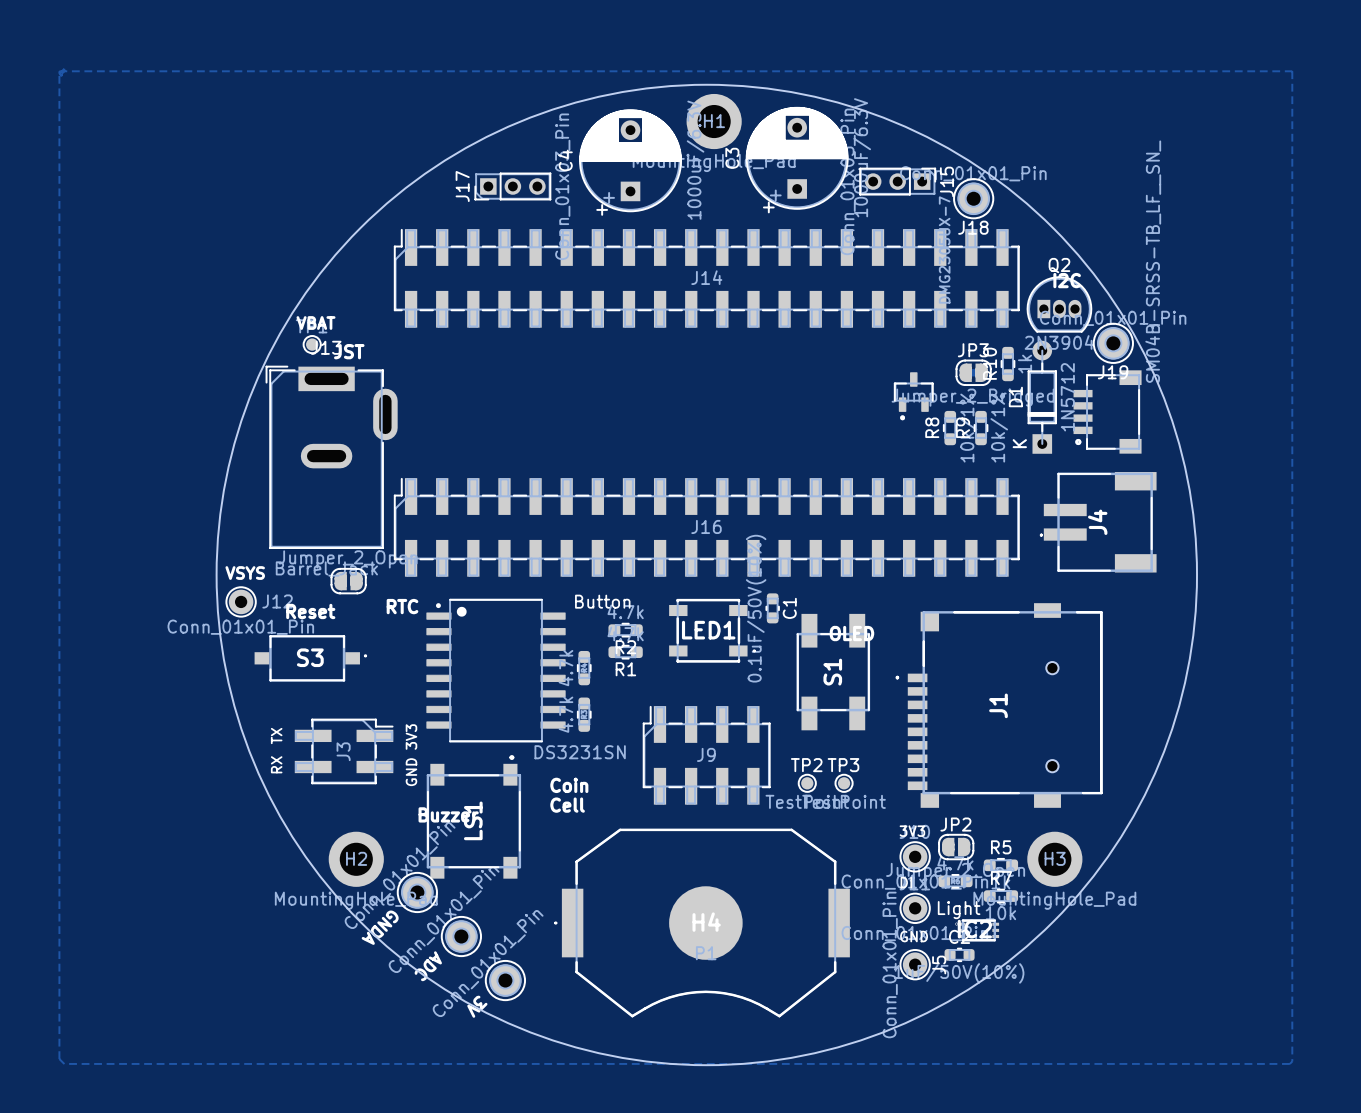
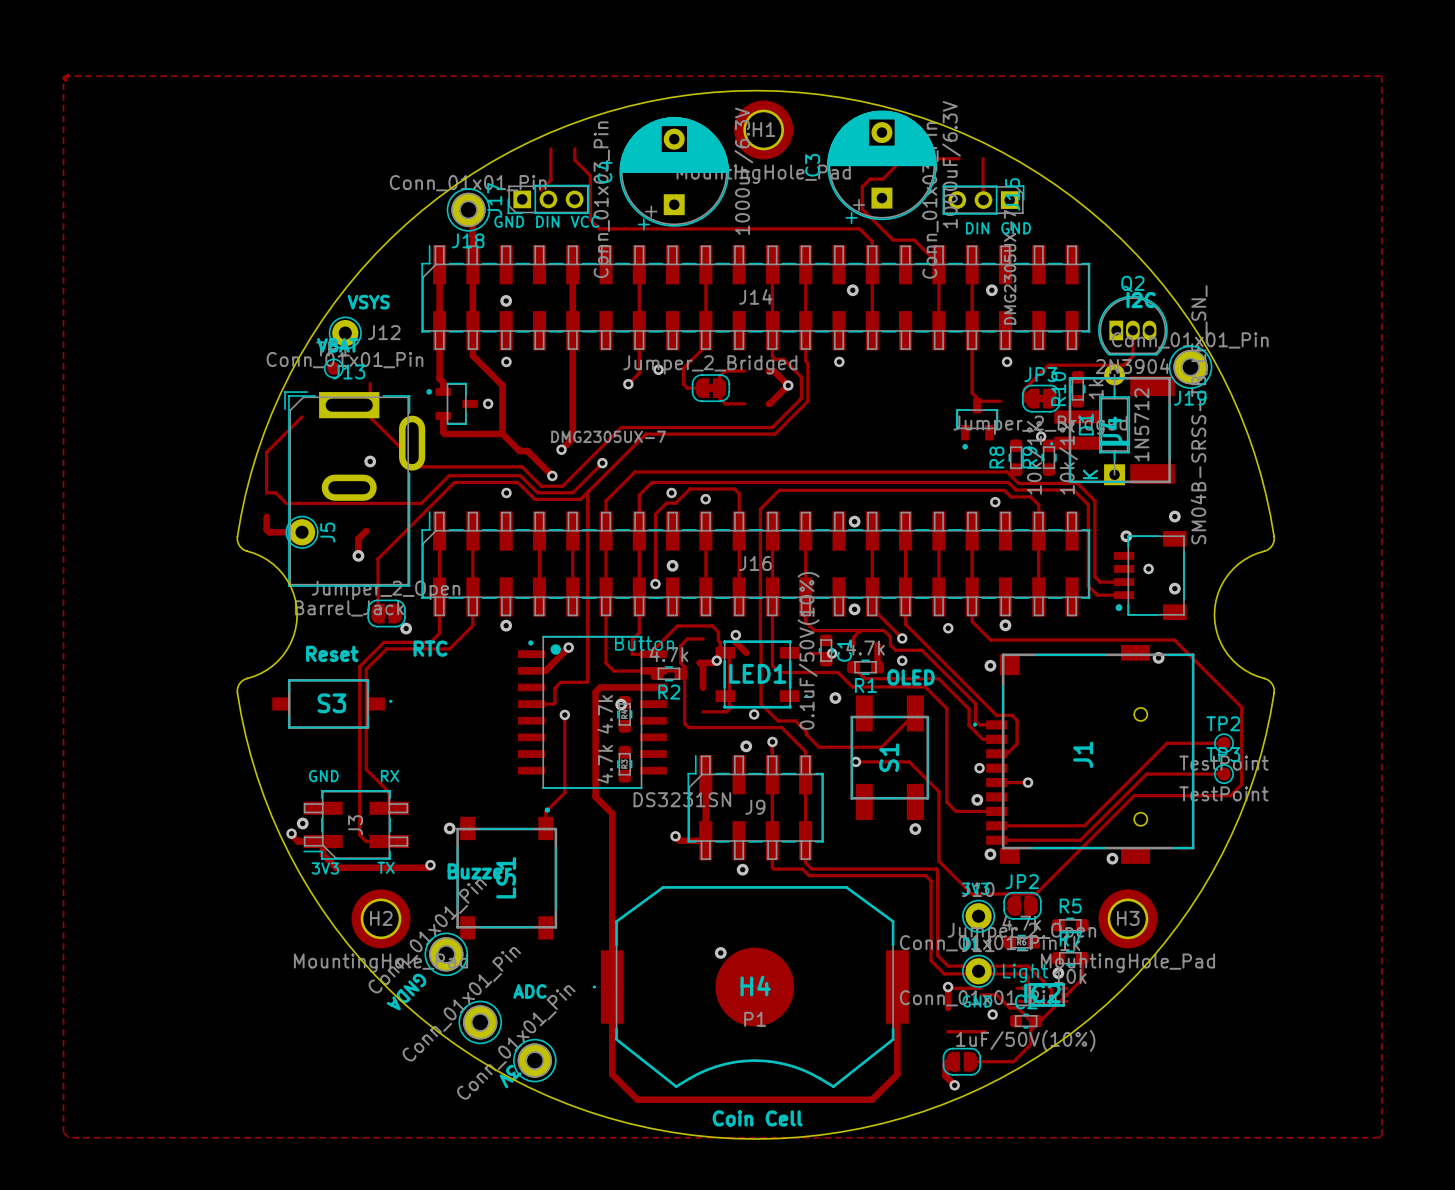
round board edge: [215, 84, 1198, 1066] -> none
track: none -> (550, 148) (550, 179) (540, 190)
track: none -> (574, 148) (574, 160) (590, 175) (590, 219) (599, 228) (859, 228) (872, 241) (872, 330)
track: none -> (959, 158) (903, 158) (882, 179) (870, 179) (862, 186) (862, 209) (893, 240) (914, 240) (938, 264) (938, 330)
track: none -> (983, 158) (983, 207)
C3 position: (797, 160) -> (881, 167)
J15 position: (897, 181) -> (983, 200)
track: none -> (472, 209) (472, 355) (502, 385) (502, 433)
J18 position: (973, 198) -> (468, 209)
text: none -> GND (509, 221)
text: none -> DIN (547, 221)
text: none -> VCC (585, 221)
text: none -> DIN (977, 228)
text: none -> GND (1016, 228)
track: none -> (439, 264) (439, 378) (443, 382) (443, 391)
track: none -> (572, 264) (572, 438) (561, 449)
track: none -> (639, 264) (639, 373) (628, 384)
track: none -> (705, 264) (705, 345) (683, 368) (683, 384) (687, 388) (702, 388)
track: none -> (772, 264) (772, 356) (775, 359) (783, 359) (801, 377) (801, 398) (772, 427) (621, 427) (562, 486) (541, 486) (521, 466) (419, 466) (370, 417) (370, 383)
track: none -> (805, 264) (805, 361) (807, 363) (807, 401) (775, 434) (645, 434) (580, 499) (534, 499) (517, 482) (454, 482) (378, 558) (378, 613)
track: none -> (972, 264) (972, 393) (980, 401) (1000, 401)
via: none -> (852, 290)
via: none -> (991, 290)
via: none -> (506, 300)
text: none -> VSYS (368, 302)
track: none -> (1132, 322) (1132, 356) (1123, 365) (1048, 365) (1024, 389) (1024, 401)
via: none -> (506, 361)
via: none -> (839, 361)
via: none -> (1007, 361)
via: none -> (658, 369)
track: none -> (744, 371) (725, 371) (719, 376) (719, 397) (725, 403) (744, 403)
track: none -> (768, 371) (773, 371) (788, 385) (768, 403)
text: JST (349, 351) -> none
via: none -> (628, 384)
via: none -> (788, 385)
part: none -> Jumper_2_Bridged (710, 388)
part: none -> DMG2305UX-7 (452, 403)
via: none -> (488, 403)
track: none -> (443, 415) (444, 433) (502, 433)
track: none -> (302, 416) (266, 452) (266, 492) (275, 492) (286, 503) (421, 503) (448, 475) (520, 475) (537, 492) (572, 492) (602, 463)
track: none -> (502, 433) (519, 451) (527, 451) (552, 475)
via: none -> (1041, 436)
part position: (1107, 411) -> (1150, 575)
via: none -> (561, 449)
via: none -> (370, 461)
via: none -> (602, 463)
via: none -> (552, 475)
track: none -> (587, 492) (587, 681) (560, 682) (554, 688) (553, 704) (531, 704)
via: none -> (506, 492)
via: none -> (671, 492)
via: none -> (705, 499)
via: none -> (995, 502)
track: none -> (266, 516) (266, 529) (269, 532) (302, 532)
via: none -> (1174, 516)
via: none -> (854, 521)
track: none -> (366, 530) (358, 538) (358, 555)
track: none -> (439, 530) (439, 633) (430, 642) (383, 642) (359, 666) (359, 835) (366, 841) (389, 841)
track: none -> (472, 530) (472, 625) (449, 648) (386, 648) (366, 669) (366, 769) (389, 792) (389, 808)
track: none -> (539, 530) (539, 597)
track: none -> (572, 530) (572, 597)
track: none -> (705, 530) (705, 597)
track: none -> (772, 530) (772, 665) (779, 672) (838, 672) (852, 686) (925, 686) (946, 708) (946, 802) (955, 811) (996, 811)
track: none -> (805, 530) (805, 621) (814, 630) (883, 630) (890, 637) (890, 644) (895, 650) (921, 650) (975, 703) (975, 720) (979, 724) (996, 724)
track: none -> (872, 530) (872, 608) (902, 638)
track: none -> (905, 530) (905, 624) (996, 715) (1012, 715) (1017, 720) (1017, 743) (1007, 753) (996, 753)
track: none -> (938, 530) (938, 597)
track: none -> (972, 530) (972, 621) (990, 640) (1174, 640) (1241, 707) (1241, 784) (1230, 795) (1134, 795) (1035, 893) (971, 893) (938, 861) (938, 791) (909, 761) (855, 761)
board edge: none -> (237, 536) (238, 542) (242, 549) (260, 556) (278, 568) (287, 580) (295, 600) (297, 614) (295, 629) (287, 649) (278, 660) (267, 669) (241, 681) (238, 686) (237, 693) (250, 755) (271, 815) (299, 873) (334, 926) (361, 959) (405, 1005) (455, 1044) (491, 1067) (529, 1087) (588, 1111) (629, 1123) (671, 1132) (713, 1137) (777, 1138) (819, 1135) (882, 1123) (923, 1111) (982, 1087) (1019, 1067) (1072, 1032) (1105, 1005) (1136, 975) (1177, 926) (1201, 891) (1231, 835) (1247, 796) (1260, 755) (1274, 693) (1273, 686) (1268, 680) (1250, 673) (1233, 660) (1220, 642) (1216, 629) (1214, 607) (1218, 593) (1224, 580) (1233, 568) (1244, 559) (1269, 548) (1273, 542) (1274, 536) (1260, 474) (1239, 413) (1211, 356) (1177, 303) (1136, 254) (1105, 224) (1055, 184) (1019, 161) (962, 133) (923, 118) (882, 106) (840, 97) (777, 91) (734, 91) (692, 94) (629, 106) (588, 118) (548, 133) (510, 151) (455, 184) (405, 224) (375, 254) (347, 286) (310, 338) (280, 394) (263, 433) (245, 494) (237, 536)
via: none -> (1126, 536)
via: none -> (358, 555)
J4 position: (1098, 522) -> (1112, 430)
via: none -> (672, 565)
via: none -> (1148, 568)
track: none -> (1124, 582) (1100, 582) (1094, 576) (1094, 500) (1077, 483) (1018, 483) (1007, 471) (634, 471) (606, 500) (606, 663) (613, 671) (681, 671) (684, 667) (680, 663) (680, 645) (687, 638) (703, 638)
track: none -> (655, 584) (655, 514) (666, 503) (675, 503) (689, 489) (734, 489) (739, 493) (739, 597)
via: none -> (655, 584)
via: none -> (1174, 588)
track: none -> (1124, 595) (1097, 595) (1088, 586) (1088, 504) (1073, 490) (1015, 490) (1008, 482) (651, 482) (639, 495) (639, 632) (632, 639) (632, 654) (655, 654)
track: none -> (1038, 597) (1038, 504) (1030, 496) (1011, 496) (1004, 490) (779, 490) (760, 509) (761, 703) (778, 720) (795, 720) (806, 732)
via: none -> (854, 609)
text: VSYS (245, 573) -> none
part position: (348, 581) -> (386, 613)
via: none -> (1005, 625)
via: none -> (506, 625)
via: none -> (406, 628)
via: none -> (948, 628)
track: none -> (860, 630) (853, 637) (853, 644)
track: none -> (735, 635) (735, 642) (746, 652)
via: none -> (735, 635)
via: none -> (902, 638)
J12 position: (241, 601) -> (345, 333)
track: none -> (877, 644) (877, 667)
track: none -> (568, 647) (545, 670) (531, 670)
via: none -> (568, 647)
track: none -> (810, 652) (832, 653)
track: none -> (653, 654) (653, 650) (677, 625) (712, 625) (718, 632) (720, 646) (729, 655) (729, 704) (731, 706) (726, 711) (703, 711)
via: none -> (832, 653)
via: none -> (1158, 657)
track: none -> (716, 660) (714, 662) (699, 662) (703, 666) (703, 687)
via: none -> (716, 660)
via: none -> (902, 660)
via: none -> (990, 665)
track: none -> (684, 667) (684, 723) (688, 727) (781, 727) (805, 752) (805, 862) (811, 869) (936, 869) (937, 955) (948, 966) (1028, 966) (1051, 989) (1051, 1000) (1048, 1003) (1017, 1001)
track: none -> (853, 667) (865, 678) (938, 678) (969, 709) (969, 725) (982, 739) (996, 739)
track: none -> (653, 687) (600, 687) (595, 692) (595, 796) (612, 813) (612, 1074) (637, 1099) (872, 1099) (897, 1074) (897, 987)
R1 position: (625, 652) -> (865, 667)
via: none -> (835, 698)
via: none -> (621, 704)
track: none -> (915, 713) (881, 747) (819, 747) (806, 732)
track: none -> (564, 714) (564, 792) (545, 811) (545, 828)
via: none -> (564, 714)
via: none -> (754, 714)
part position: (496, 670) -> (592, 712)
S1 position: (833, 672) -> (889, 757)
track: none -> (772, 741) (772, 867) (802, 869) (809, 875) (925, 875) (931, 880) (931, 960) (944, 973) (1025, 973) (1028, 976) (1028, 984) (1024, 988) (1017, 988)
via: none -> (772, 741)
track: none -> (1223, 743) (1166, 743) (1084, 825) (996, 825)
via: none -> (746, 746)
J1 position: (999, 705) -> (1083, 754)
via: none -> (855, 761)
via: none -> (979, 768)
track: none -> (1223, 774) (1146, 774) (1080, 840) (996, 840)
track: none -> (705, 774) (705, 840) (679, 840) (675, 836)
track: none -> (996, 782) (1028, 782)
via: none -> (1028, 782)
text rotation: 0° (276, 736) -> 90° clockwise (386, 867)
text position: TX (276, 736) -> TX (386, 867)
text rotation: 0° (411, 737) -> 90° clockwise (325, 868)
text position: 3V3 (411, 737) -> 3V3 (325, 868)
via: none -> (977, 799)
J3 rotation: 0° (344, 751) -> 180° (356, 824)
text rotation: 0° (276, 764) -> 90° clockwise (389, 776)
text position: RX (276, 764) -> RX (389, 776)
via: none -> (302, 823)
text rotation: 0° (411, 772) -> 90° clockwise (323, 776)
text position: GND (411, 772) -> GND (323, 776)
via: none -> (449, 828)
via: none -> (915, 829)
via: none -> (291, 833)
track: none -> (291, 835) (290, 833) (298, 841) (323, 841) (323, 854) (336, 867) (427, 867) (430, 865)
via: none -> (675, 836)
TP2 position: (807, 783) -> (1223, 743)
TP3 position: (844, 783) -> (1223, 774)
text: Coin (569, 785) -> none
via: none -> (990, 854)
via: none -> (1112, 858)
text: Cell (567, 805) -> none
via: none -> (430, 865)
via: none -> (742, 869)
via: none -> (720, 952)
track: none -> (1082, 958) (1082, 979) (1030, 1029)
via: none -> (1058, 973)
via: none -> (948, 987)
track: none -> (981, 988) (948, 987) (948, 1007)
track: none -> (981, 994) (996, 994) (1009, 1007) (1017, 1007) (1030, 1021) (1030, 1044) (1013, 1061) (970, 1061)
part position: (461, 936) -> (480, 1022)
via: none -> (992, 1014)
track: none -> (948, 1031) (984, 1031)
J5 value: Conn_01x01_Pin (890, 964) -> none
J5 position: (915, 964) -> (302, 532)
text rotation: 0° (428, 966) -> 135° counterclockwise (529, 991)
text position: ADC (428, 966) -> ADC (529, 991)
part position: (505, 980) -> (534, 1060)
track: none -> (953, 1061) (948, 1061) (945, 1064) (945, 1076) (954, 1085)
part: none -> (961, 1061)
via: none -> (954, 1085)
text: none -> Coin Cell (757, 1118)

